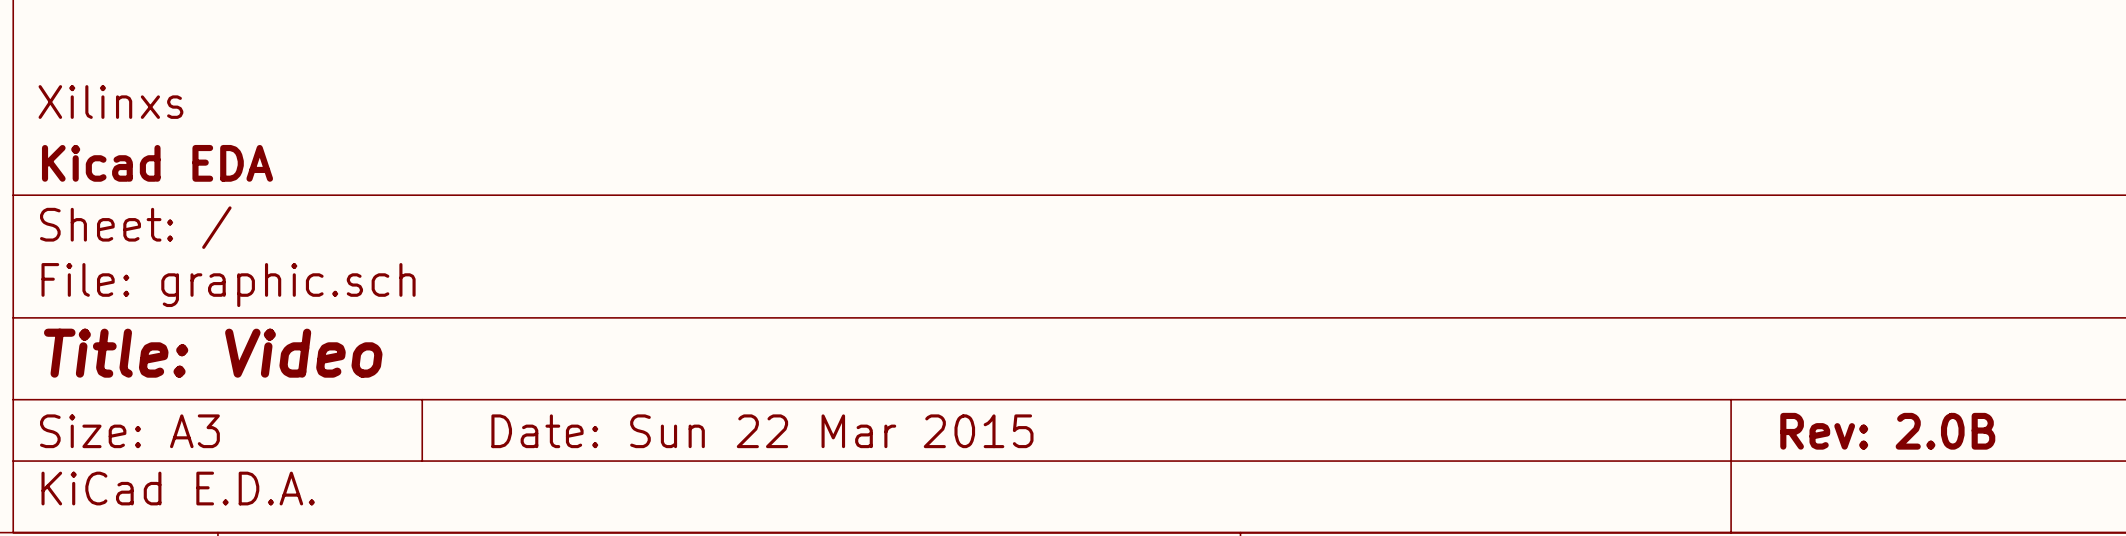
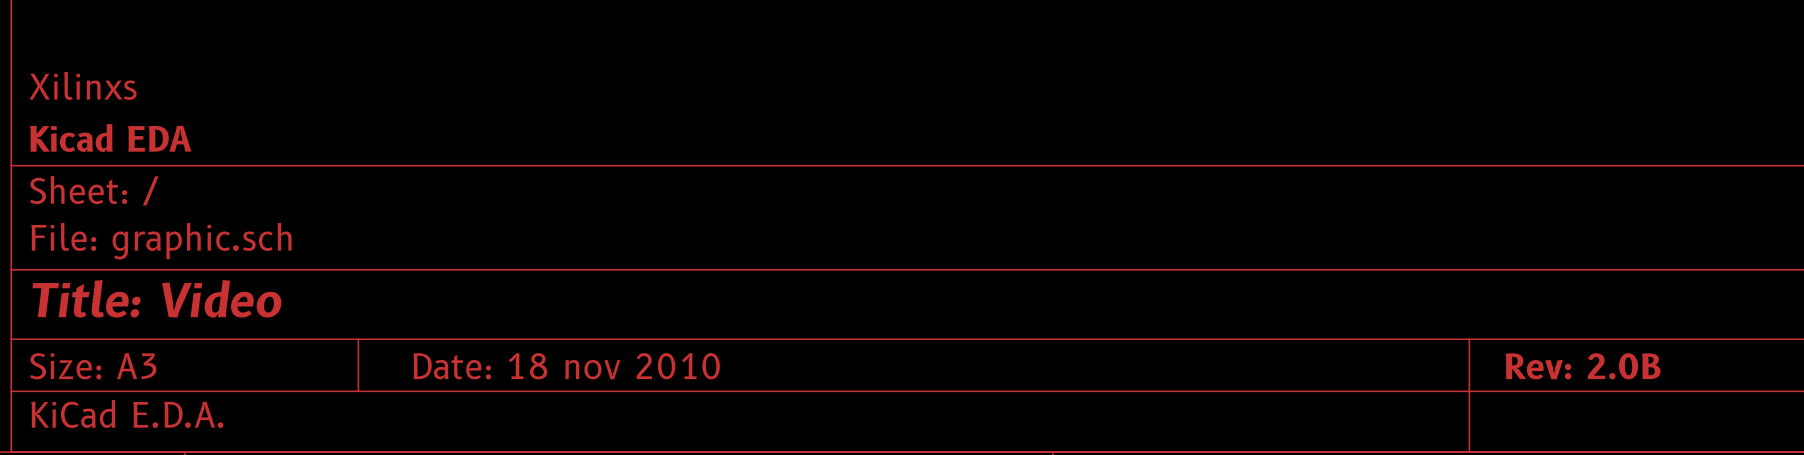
title block: Date: Sun 22 Mar 2015 (762, 431) -> Date: 18 nov 2010 (566, 366)

